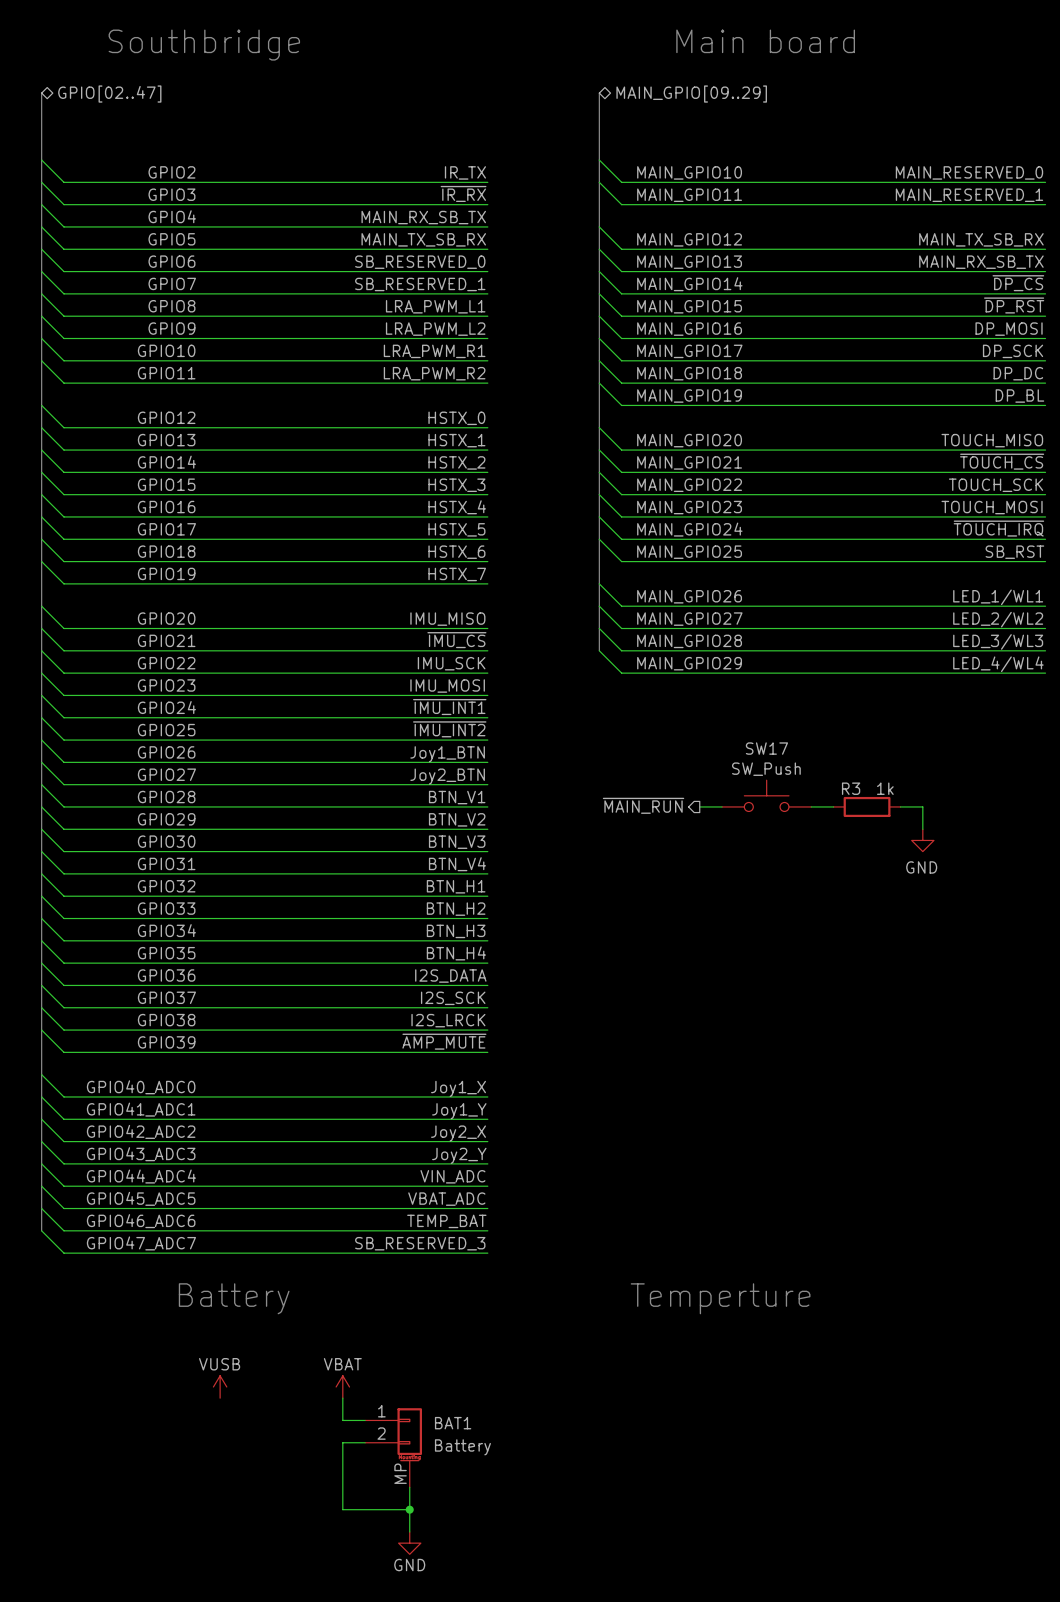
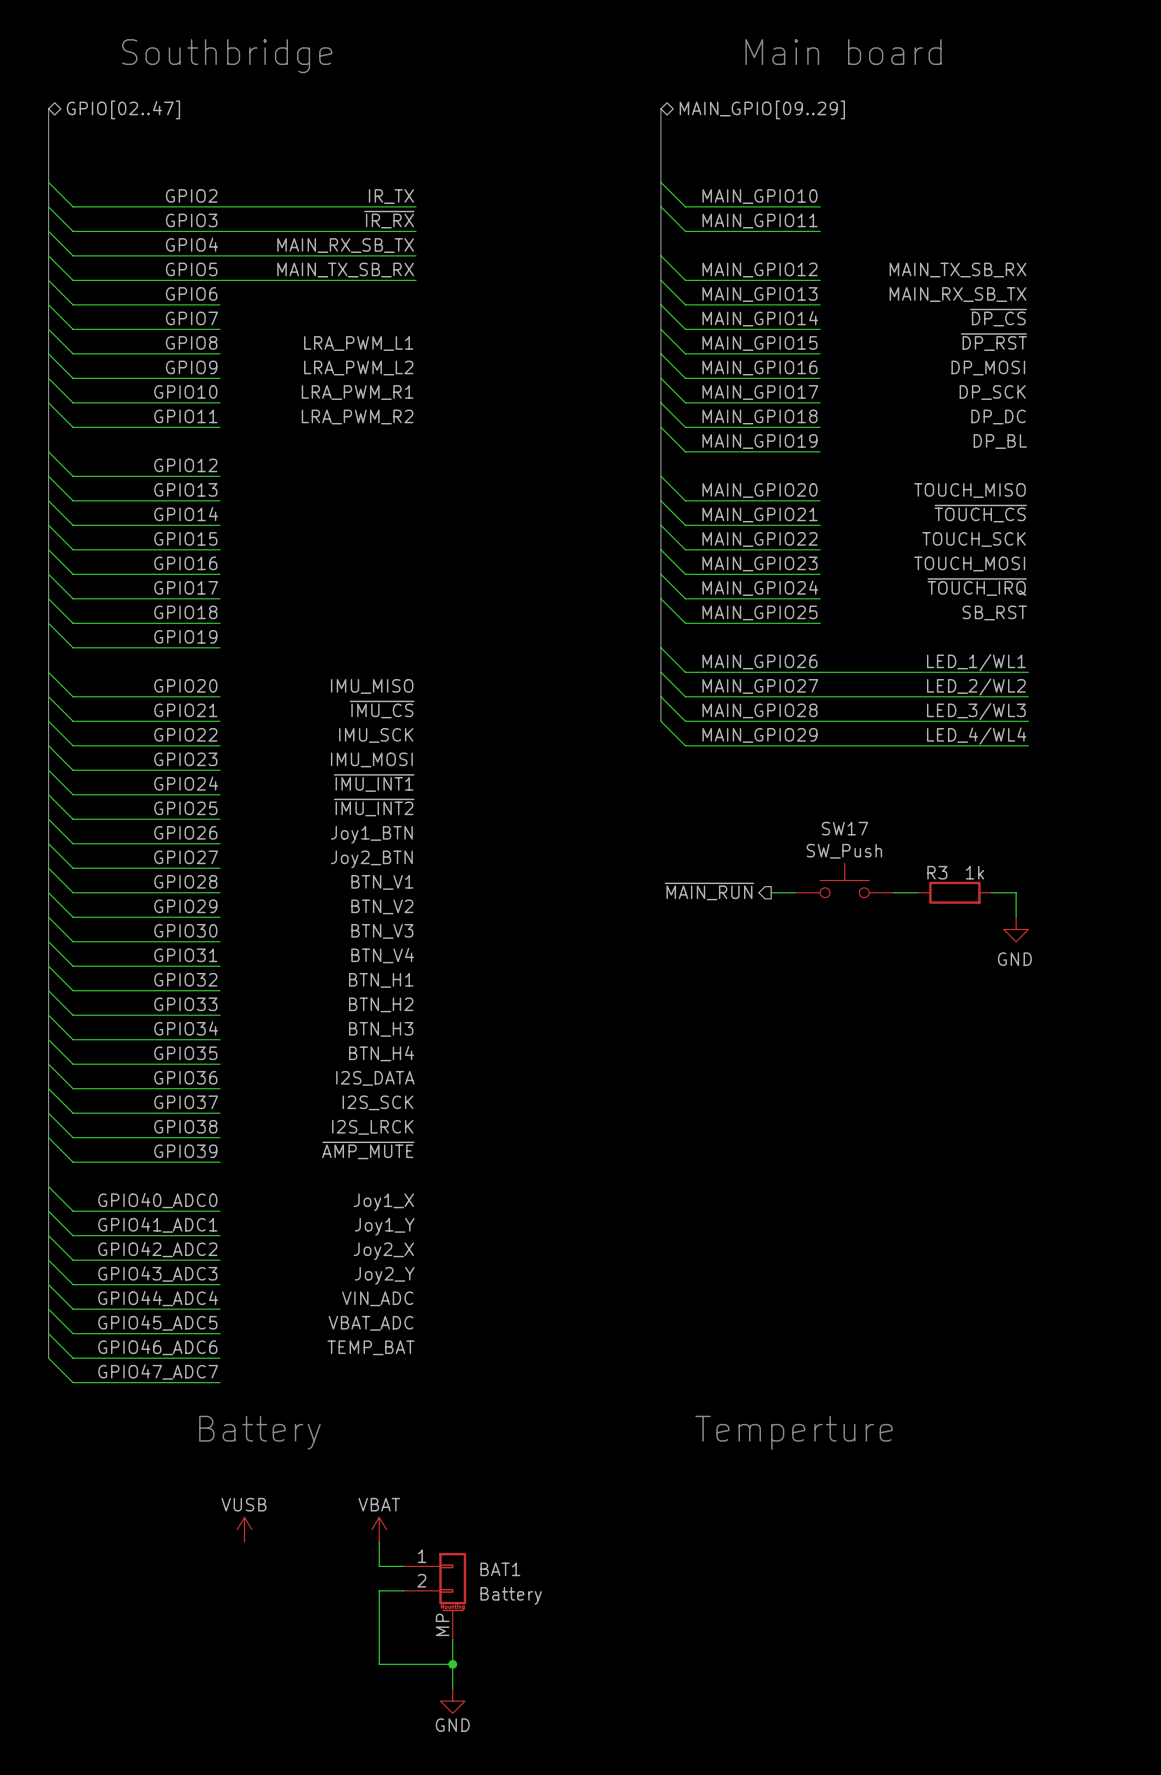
label position: IR_TX (465, 172) -> IR_TX (391, 196)
label: MAIN_RESERVED_0 (969, 172) -> none
wire: (376, 182) (487, 182) -> none
wire: (744, 182) (1045, 182) -> none
label position: ~{IR_RX} (463, 193) -> ~{IR_RX} (389, 219)
label: MAIN_RESERVED_1 (969, 195) -> none
wire: (376, 204) (487, 204) -> none
wire: (744, 204) (1045, 204) -> none
label position: MAIN_RX_SB_TX (423, 217) -> MAIN_RX_SB_TX (345, 245)
wire: (376, 226) (487, 226) -> none
label position: MAIN_TX_SB_RX (423, 239) -> MAIN_TX_SB_RX (345, 270)
label position: MAIN_TX_SB_RX (981, 239) -> MAIN_TX_SB_RX (958, 270)
wire: (376, 249) (487, 249) -> none
wire: (744, 249) (1045, 249) -> none
label: SB_RESERVED_0 (420, 262) -> none
label position: MAIN_RX_SB_TX (981, 262) -> MAIN_RX_SB_TX (958, 294)
wire: (197, 271) (487, 271) -> none
wire: (744, 271) (1045, 271) -> none
label position: ~{DP_CS} (1018, 283) -> ~{DP_CS} (998, 317)
label: SB_RESERVED_1 (420, 284) -> none
wire: (197, 293) (487, 293) -> none
wire: (744, 293) (1045, 293) -> none
label position: ~{DP_RST} (1014, 305) -> ~{DP_RST} (993, 342)
label position: LRA_PWM_L1 (435, 306) -> LRA_PWM_L1 (358, 343)
wire: (197, 316) (487, 316) -> none
wire: (744, 316) (1045, 316) -> none
label position: LRA_PWM_L2 (435, 329) -> LRA_PWM_L2 (358, 368)
label position: DP_MOSI (1009, 329) -> DP_MOSI (988, 368)
wire: (197, 338) (487, 338) -> none
wire: (744, 338) (1045, 338) -> none
label position: LRA_PWM_R1 (434, 351) -> LRA_PWM_R1 (357, 392)
label position: DP_SCK (1013, 351) -> DP_SCK (992, 392)
wire: (197, 360) (487, 360) -> none
wire: (744, 360) (1045, 360) -> none
label position: LRA_PWM_R2 (434, 373) -> LRA_PWM_R2 (357, 417)
label position: DP_DC (1018, 373) -> DP_DC (998, 417)
wire: (197, 383) (487, 383) -> none
wire: (744, 383) (1045, 383) -> none
label position: DP_BL (1019, 396) -> DP_BL (1000, 441)
wire: (744, 405) (1045, 405) -> none
label: HSTX_0 (456, 418) -> none
wire: (197, 427) (487, 427) -> none
label: HSTX_1 (456, 440) -> none
label position: TOUCH_MISO (992, 440) -> TOUCH_MISO (969, 490)
wire: (197, 450) (487, 450) -> none
wire: (744, 450) (1045, 450) -> none
label position: ~{TOUCH_CS} (1002, 461) -> ~{TOUCH_CS} (980, 513)
label: HSTX_2 (456, 462) -> none
wire: (197, 472) (487, 472) -> none
wire: (744, 472) (1045, 472) -> none
label: HSTX_3 (456, 485) -> none
label position: TOUCH_SCK (996, 485) -> TOUCH_SCK (974, 539)
wire: (197, 494) (487, 494) -> none
wire: (744, 494) (1045, 494) -> none
label: HSTX_4 (457, 507) -> none
label position: TOUCH_MOSI (992, 507) -> TOUCH_MOSI (969, 563)
wire: (197, 516) (487, 516) -> none
wire: (744, 516) (1045, 516) -> none
label position: ~{TOUCH_IRQ} (998, 528) -> ~{TOUCH_IRQ} (977, 587)
label: HSTX_5 (456, 529) -> none
wire: (197, 539) (487, 539) -> none
wire: (744, 539) (1045, 539) -> none
label: HSTX_6 (456, 552) -> none
label position: SB_RST (1014, 552) -> SB_RST (994, 612)
wire: (197, 561) (487, 561) -> none
wire: (744, 561) (1045, 561) -> none
label: HSTX_7 (457, 574) -> none
wire: (197, 583) (487, 583) -> none
label position: LED_1/WL1 (998, 597) -> LED_1/WL1 (976, 662)
wire: (933, 606) (1045, 606) -> none
label position: IMU_MISO (447, 619) -> IMU_MISO (372, 686)
label position: LED_2/WL2 (998, 619) -> LED_2/WL2 (976, 687)
wire: (197, 628) (487, 628) -> none
wire: (933, 628) (1045, 628) -> none
label position: ~{IMU_CS} (456, 640) -> ~{IMU_CS} (382, 709)
label position: LED_3/WL3 (998, 641) -> LED_3/WL3 (976, 711)
wire: (197, 650) (487, 650) -> none
wire: (933, 650) (1045, 650) -> none
label position: IMU_SCK (451, 663) -> IMU_SCK (376, 735)
label position: LED_4/WL4 (998, 664) -> LED_4/WL4 (976, 736)
wire: (197, 673) (487, 673) -> none
wire: (933, 673) (1045, 673) -> none
label position: IMU_MOSI (447, 686) -> IMU_MOSI (371, 759)
wire: (197, 695) (487, 695) -> none
label position: ~{IMU_INT1} (449, 707) -> ~{IMU_INT1} (374, 783)
wire: (197, 717) (487, 717) -> none
label position: ~{IMU_INT2} (449, 729) -> ~{IMU_INT2} (374, 807)
wire: (197, 740) (487, 740) -> none
label position: Joy1_BTN (447, 754) -> Joy1_BTN (371, 834)
wire: (197, 762) (487, 762) -> none
label position: Joy2_BTN (447, 776) -> Joy2_BTN (371, 859)
wire: (197, 784) (487, 784) -> none
label position: BTN_V1 (457, 797) -> BTN_V1 (382, 882)
wire: (197, 806) (487, 806) -> none
label position: BTN_V2 (457, 819) -> BTN_V2 (382, 906)
wire: (197, 829) (487, 829) -> none
label position: BTN_V3 (457, 842) -> BTN_V3 (382, 931)
wire: (197, 851) (487, 851) -> none
label position: BTN_V4 (457, 864) -> BTN_V4 (382, 955)
wire: (197, 873) (487, 873) -> none
label position: BTN_H1 (456, 886) -> BTN_H1 (381, 980)
wire: (197, 896) (487, 896) -> none
label position: BTN_H2 (456, 909) -> BTN_H2 (381, 1004)
wire: (197, 918) (487, 918) -> none
label position: BTN_H3 (456, 931) -> BTN_H3 (381, 1029)
wire: (197, 940) (487, 940) -> none
label position: BTN_H4 (456, 953) -> BTN_H4 (381, 1053)
wire: (197, 963) (487, 963) -> none
label position: I2S_DATA (450, 976) -> I2S_DATA (375, 1078)
wire: (197, 985) (487, 985) -> none
label position: I2S_SCK (453, 998) -> I2S_SCK (377, 1102)
wire: (197, 1007) (487, 1007) -> none
label position: I2S_LRCK (448, 1020) -> I2S_LRCK (372, 1127)
wire: (197, 1030) (487, 1030) -> none
label position: ~{AMP_MUTE} (444, 1041) -> ~{AMP_MUTE} (368, 1150)
wire: (197, 1052) (487, 1052) -> none
label position: Joy1_X (458, 1088) -> Joy1_X (383, 1202)
wire: (197, 1096) (487, 1096) -> none
label position: Joy1_Y (459, 1111) -> Joy1_Y (384, 1226)
wire: (197, 1119) (487, 1119) -> none
label position: Joy2_X (458, 1133) -> Joy2_X (383, 1251)
wire: (197, 1141) (487, 1141) -> none
label position: Joy2_Y (459, 1155) -> Joy2_Y (384, 1275)
wire: (197, 1163) (487, 1163) -> none
label position: VIN_ADC (452, 1176) -> VIN_ADC (377, 1298)
wire: (197, 1186) (487, 1186) -> none
label position: VBAT_ADC (446, 1199) -> VBAT_ADC (370, 1323)
wire: (197, 1208) (487, 1208) -> none
label position: TEMP_BAT (446, 1221) -> TEMP_BAT (370, 1347)
wire: (197, 1230) (487, 1230) -> none
label: SB_RESERVED_3 (420, 1243) -> none
wire: (197, 1253) (487, 1253) -> none

